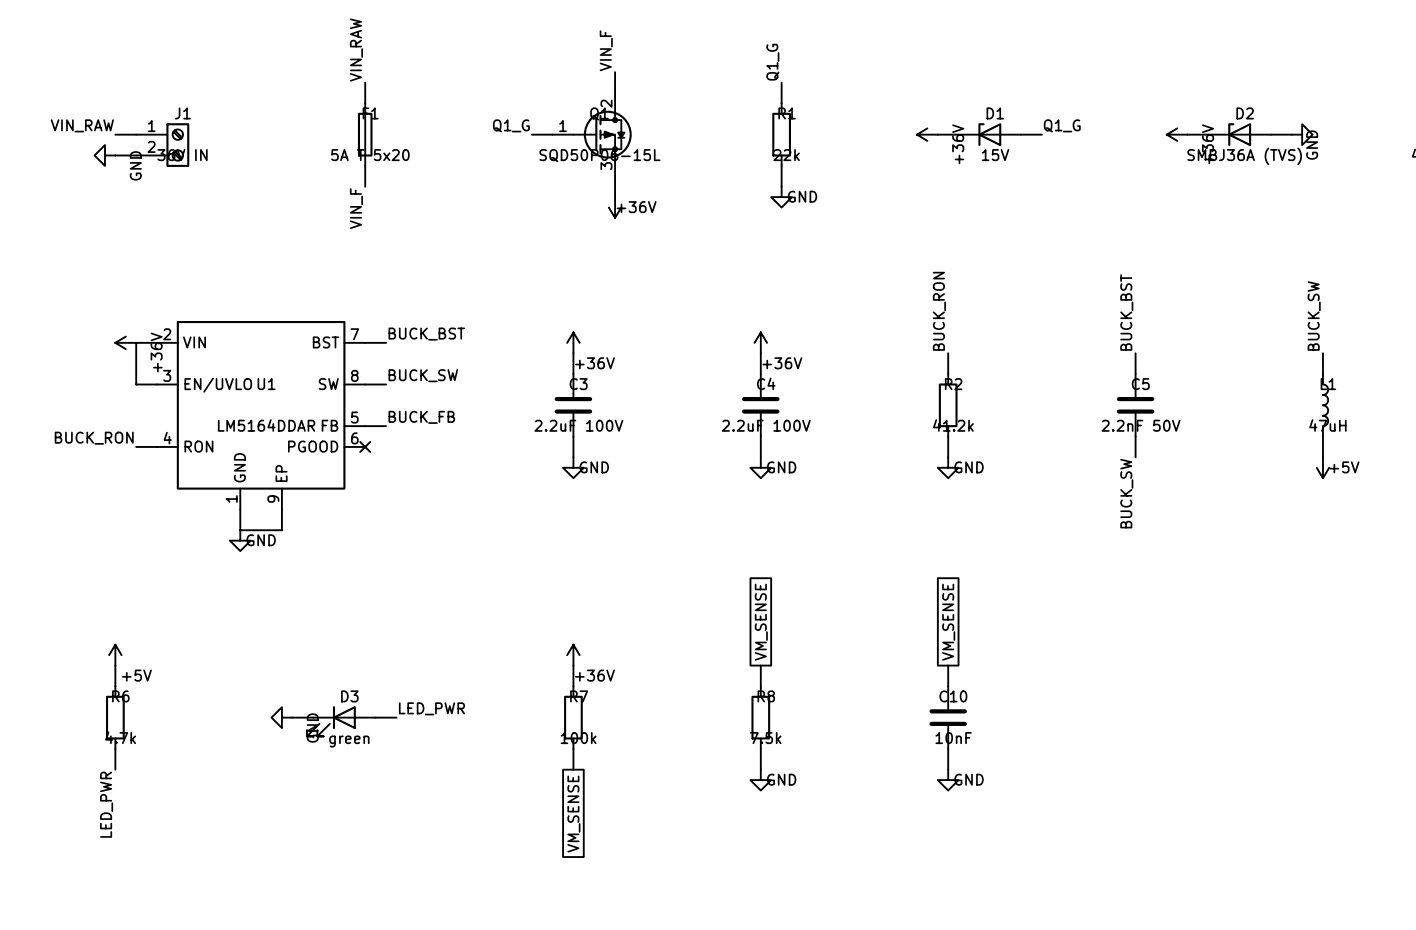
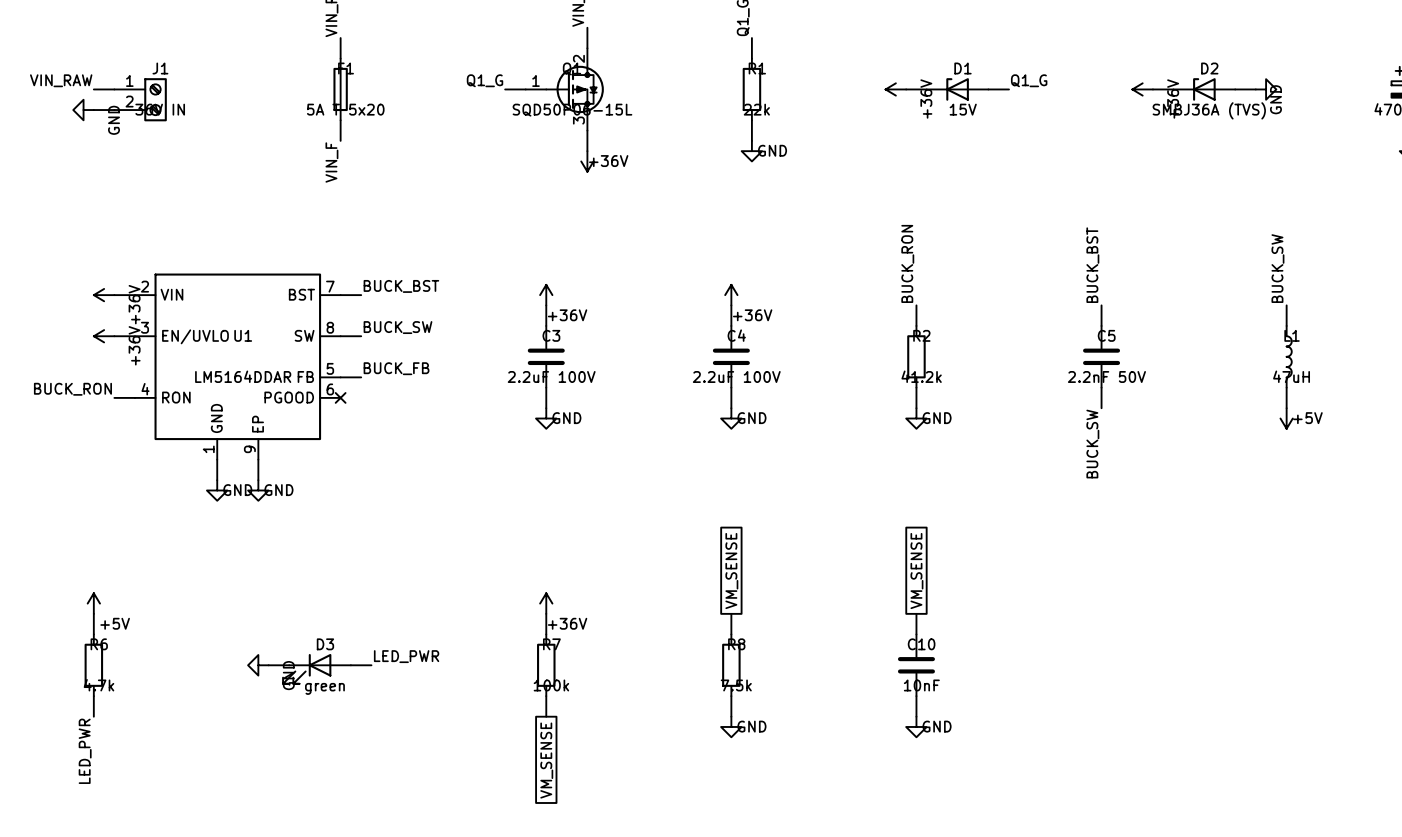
wire: (136, 342) (136, 384) -> none
power symbol: none -> +36V (104, 336)
wire: (240, 530) (281, 530) -> none
power symbol: none -> GND (258, 490)

